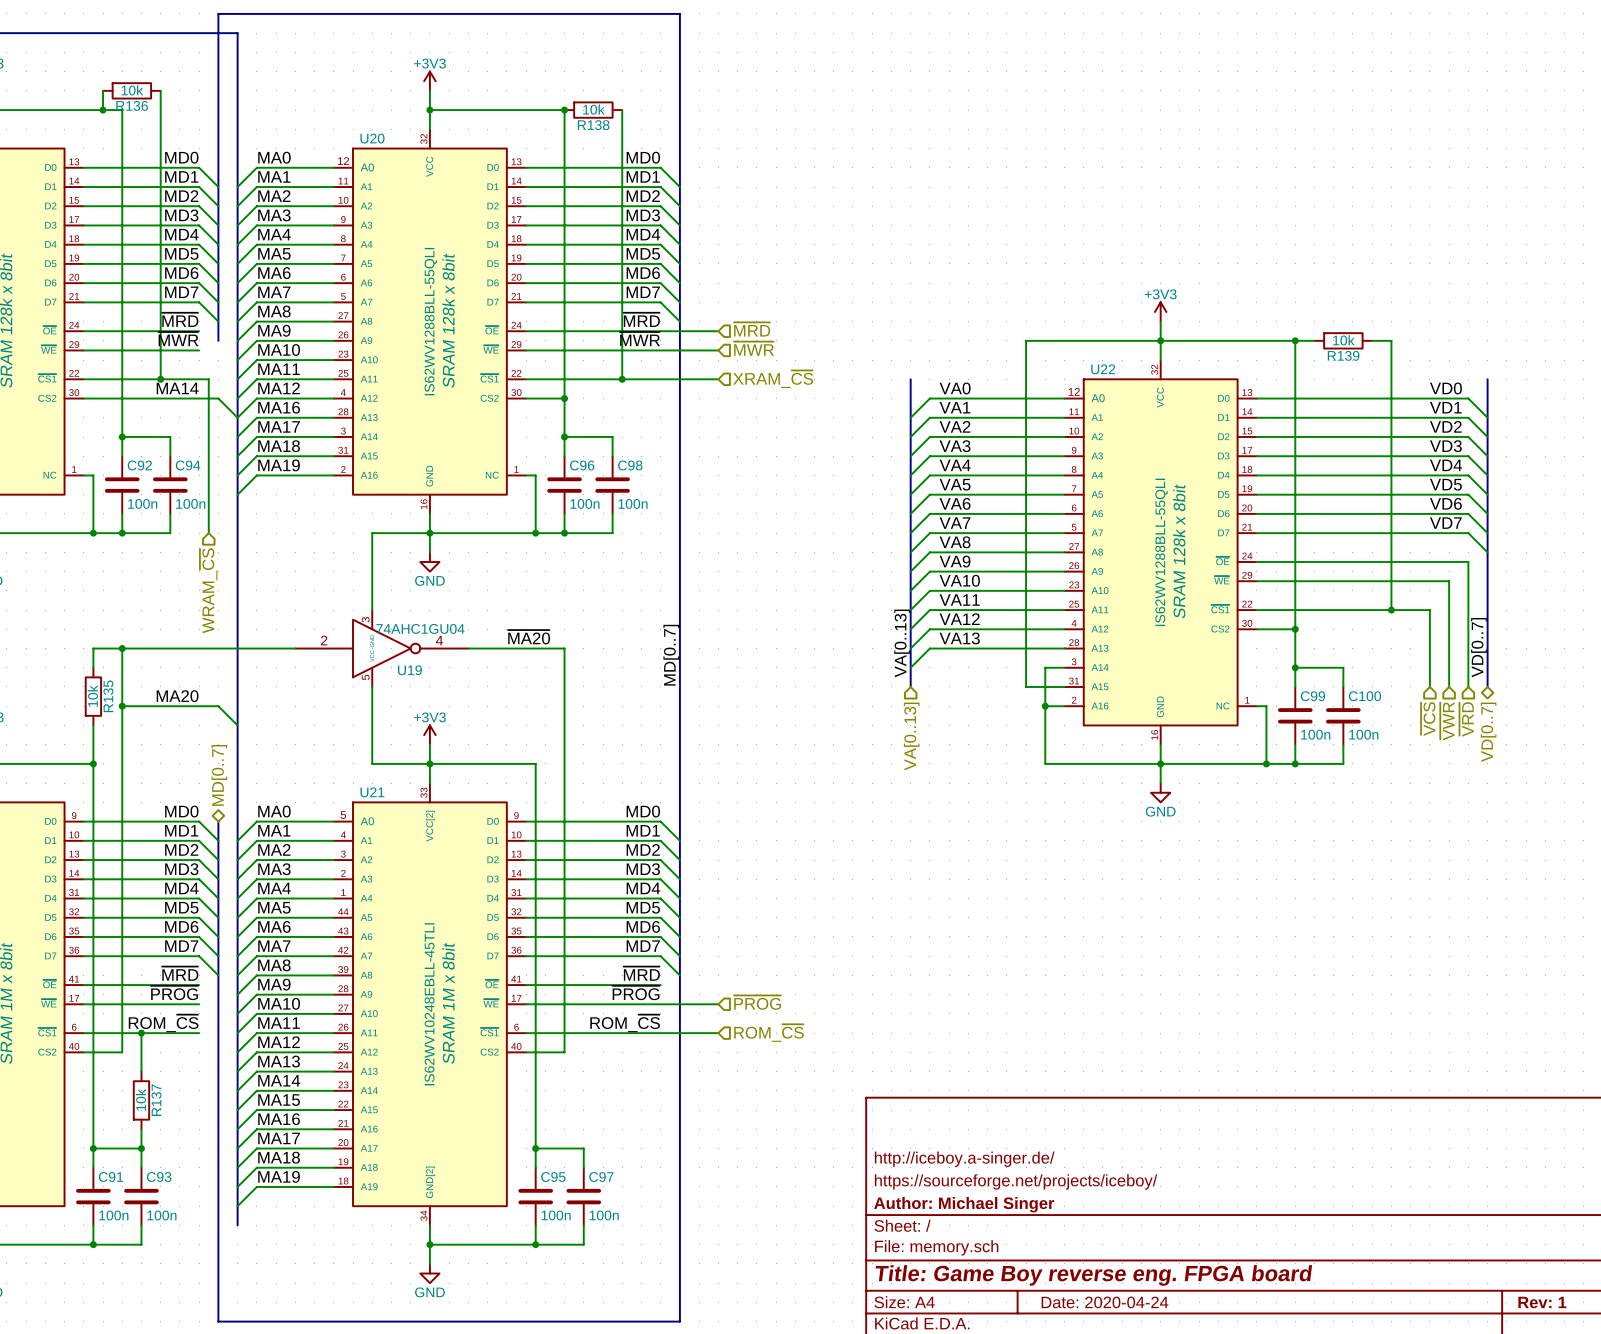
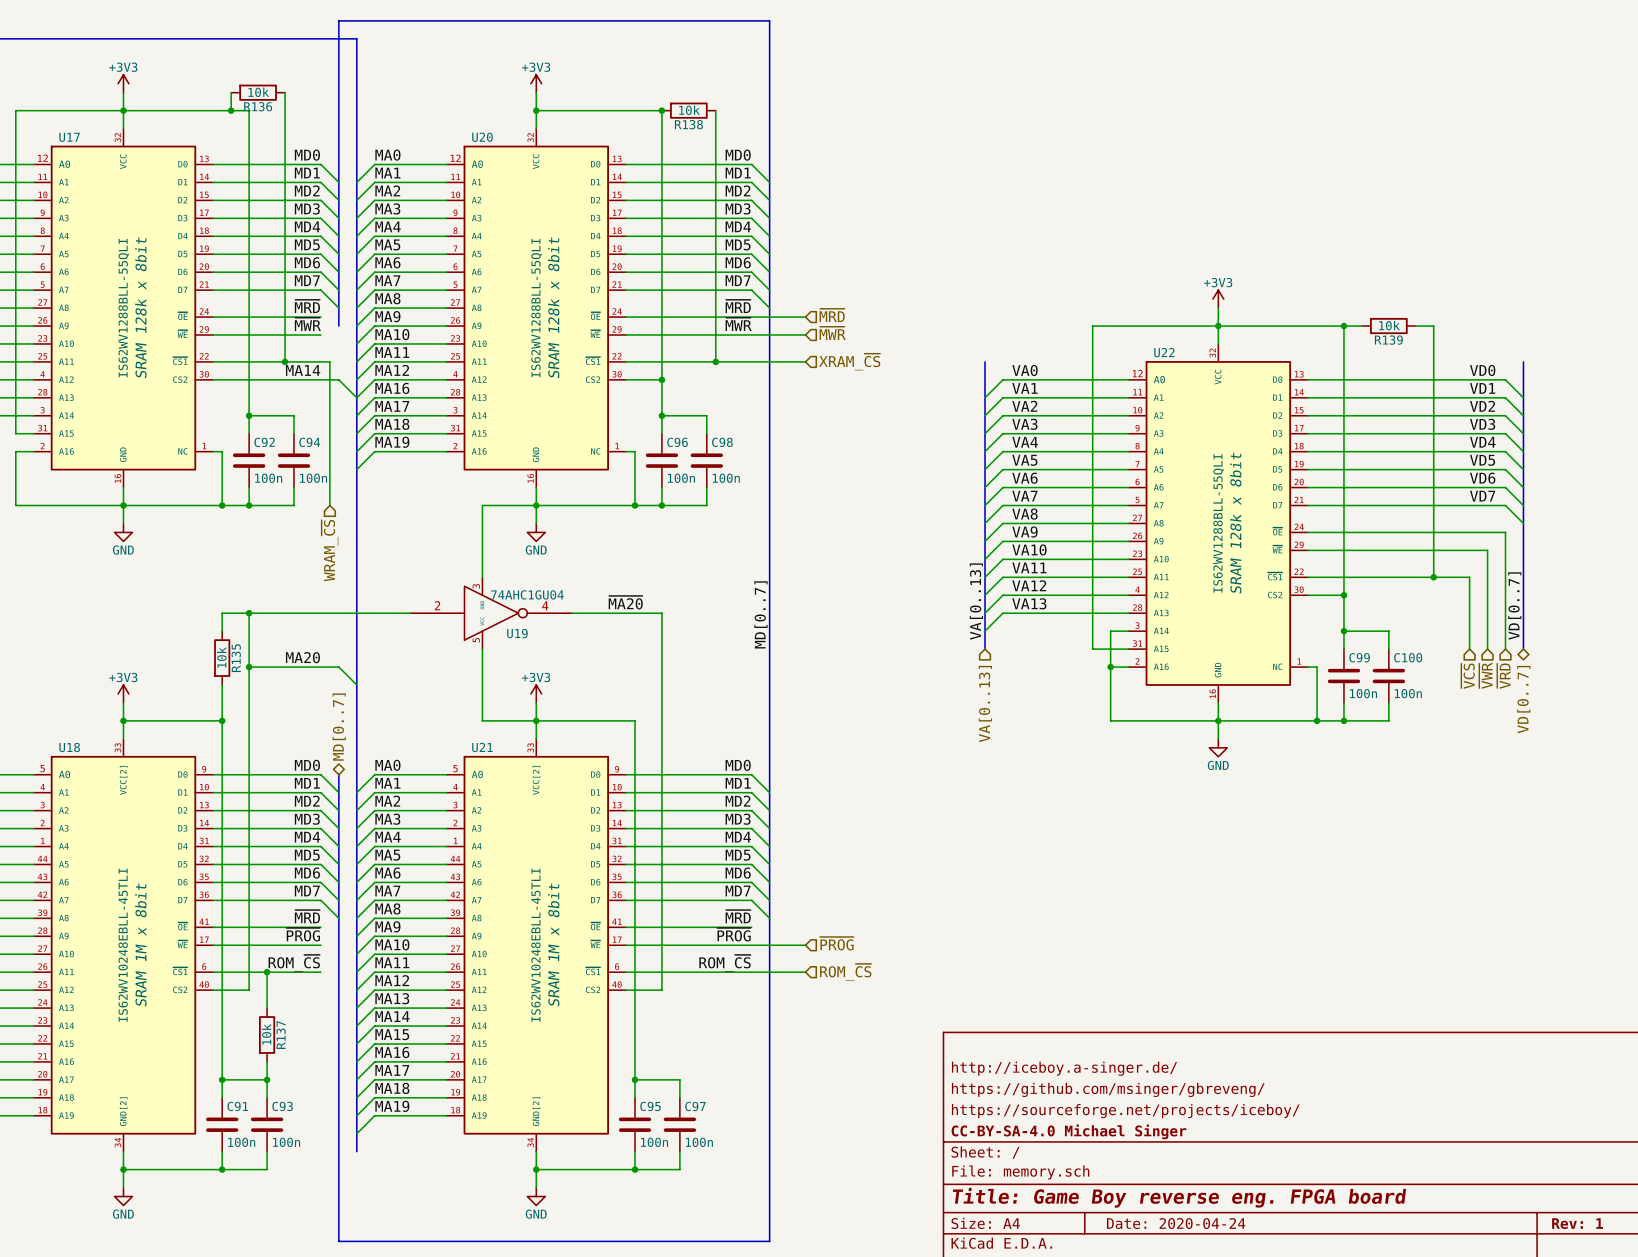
title block: none -> http://iceboy.a-singer.de/ (1064, 1068)
title block: http://iceboy.a-singer.de/ (964, 1159) -> https://github.com/msinger/gbreveng/ (1108, 1089)
title block: Author: Michael Singer (964, 1204) -> CC-BY-SA-4.0 Michael Singer (1068, 1131)

